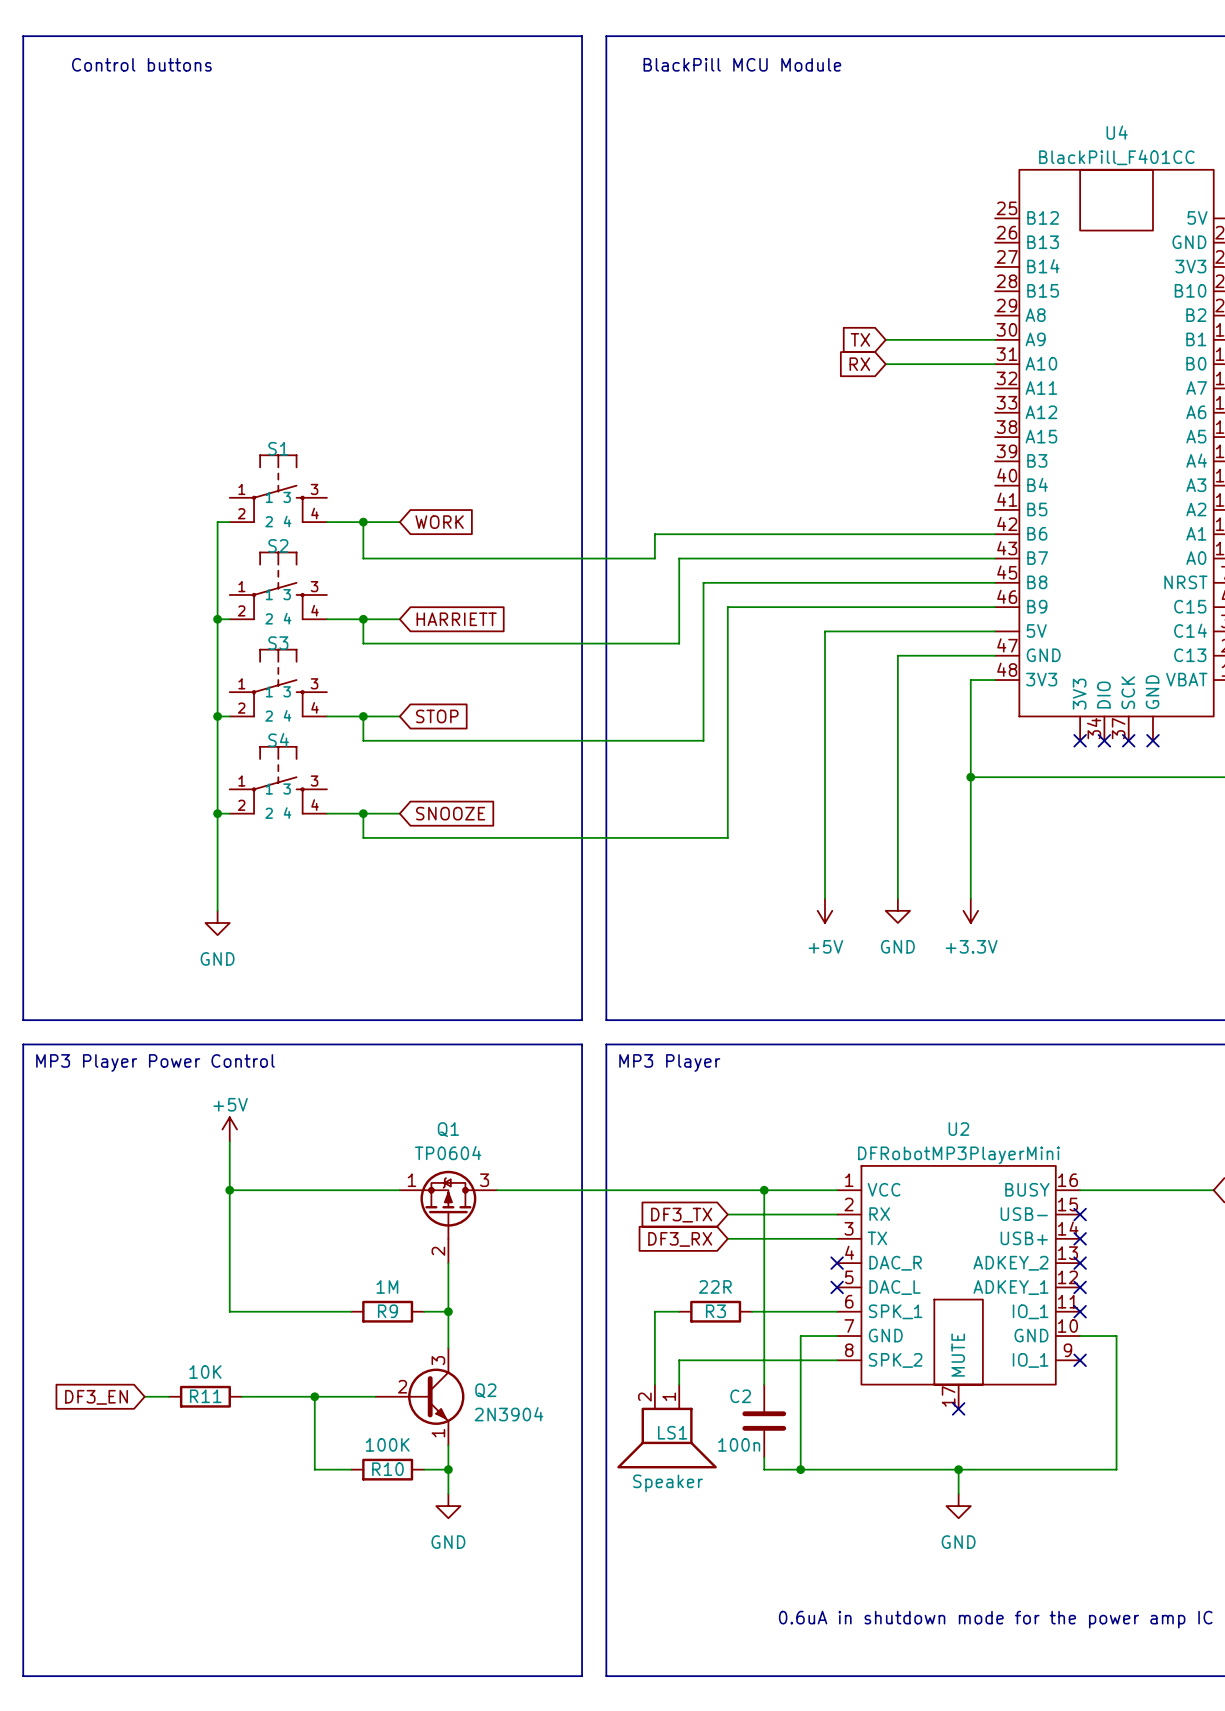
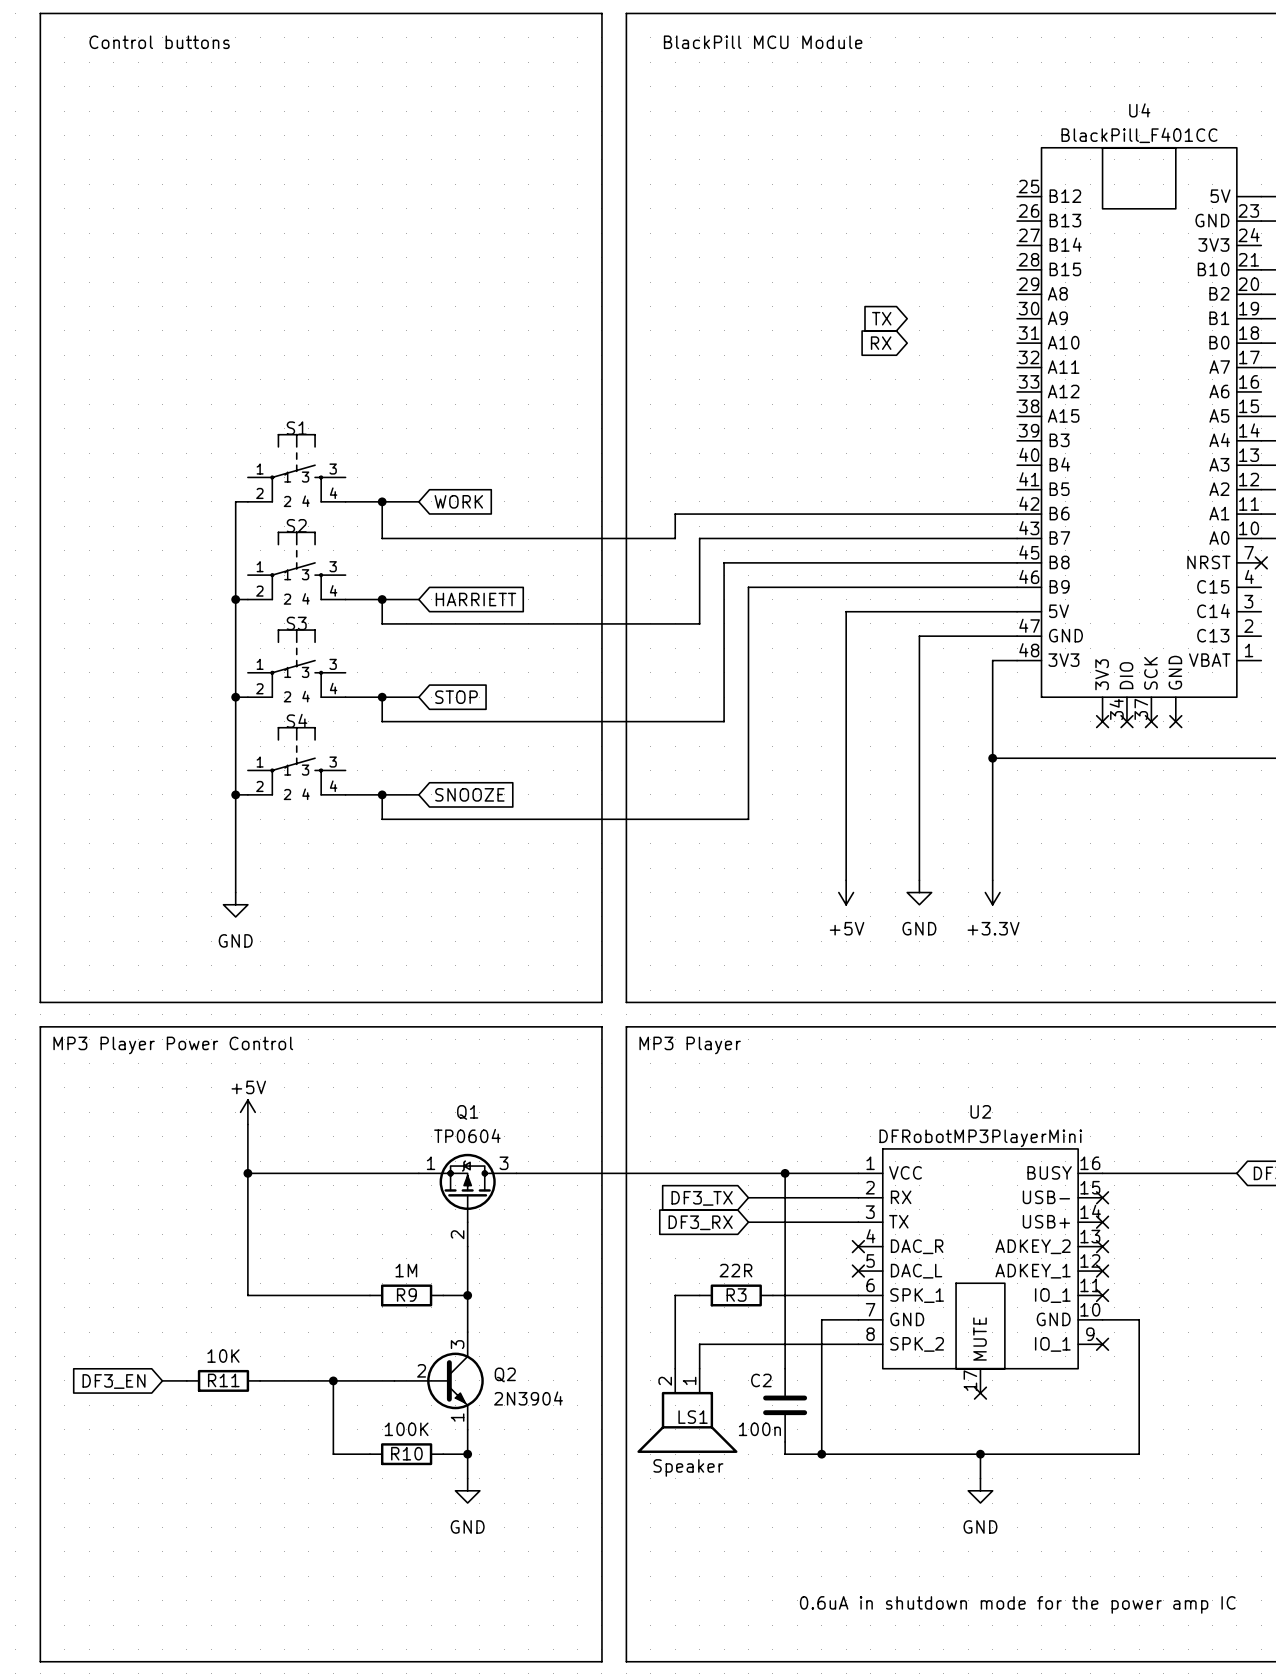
wire: (885, 339) (995, 339) -> none
wire: (885, 364) (995, 364) -> none

